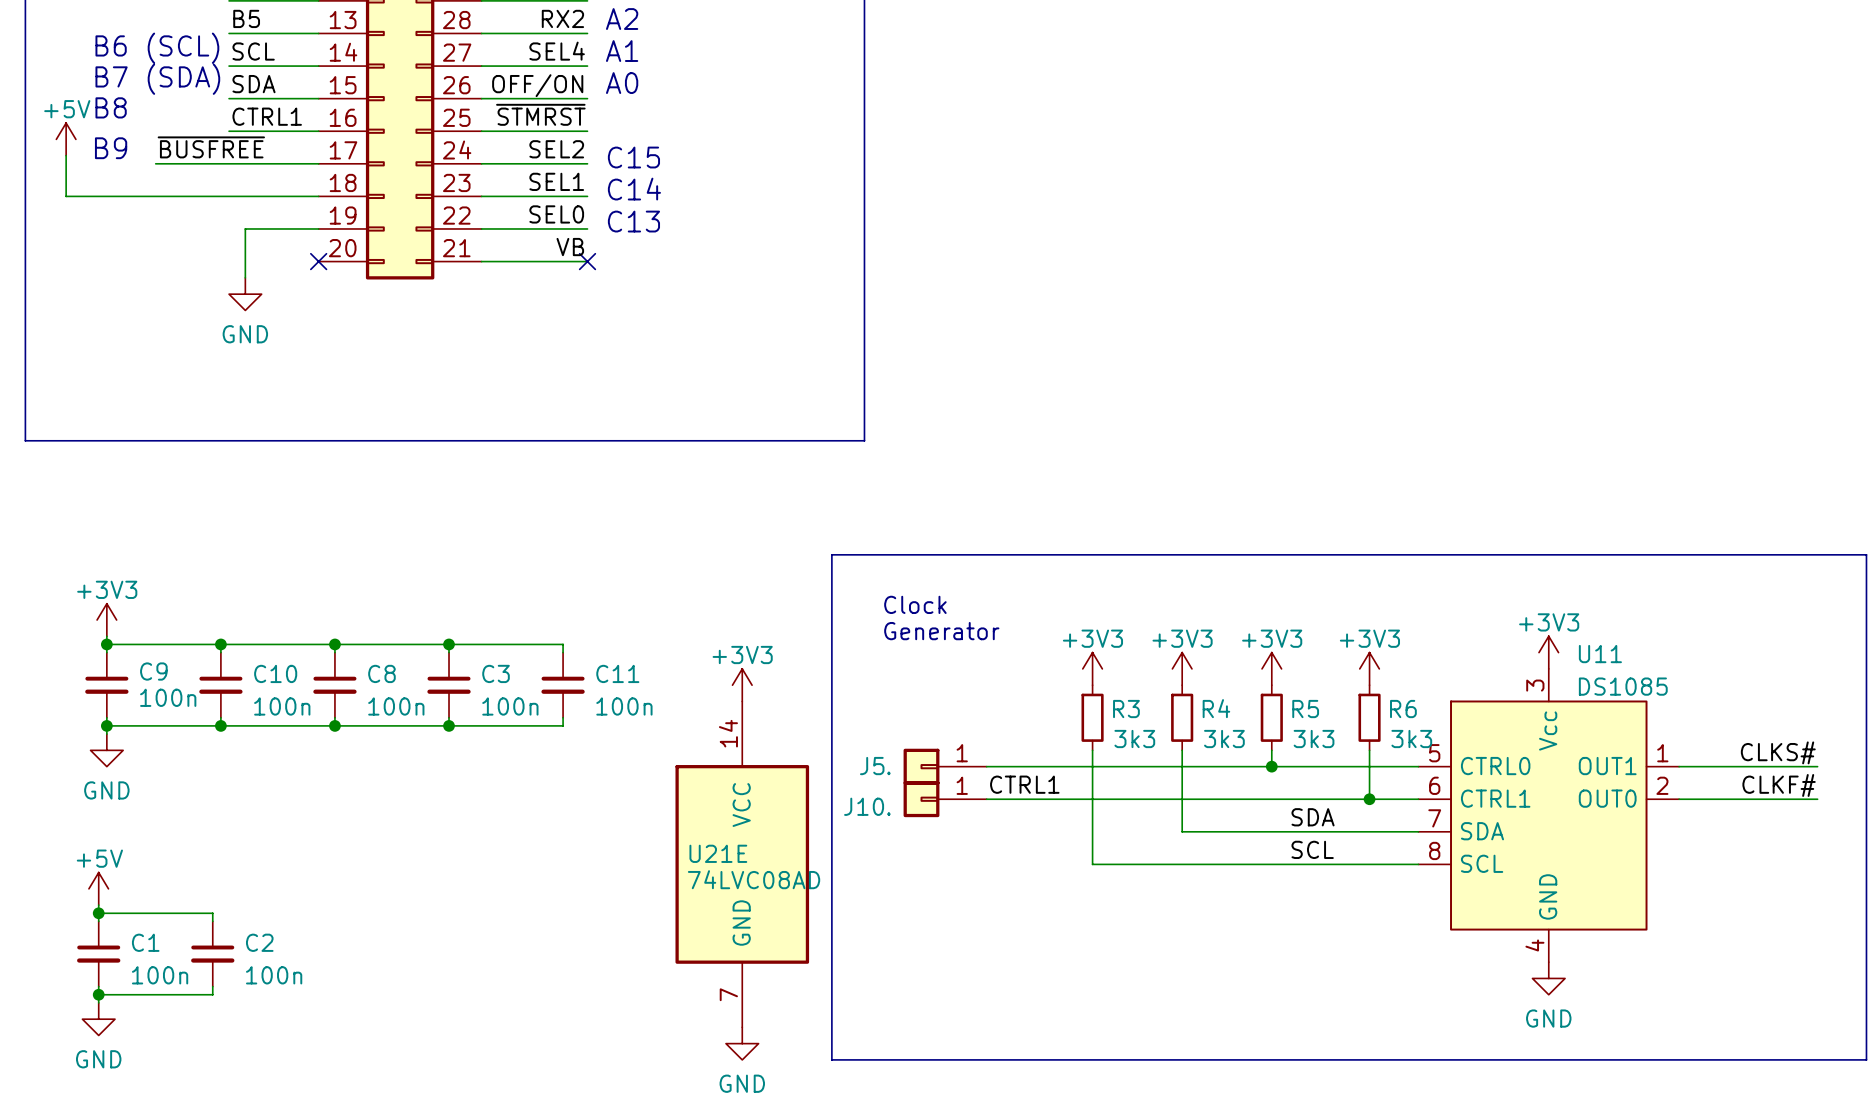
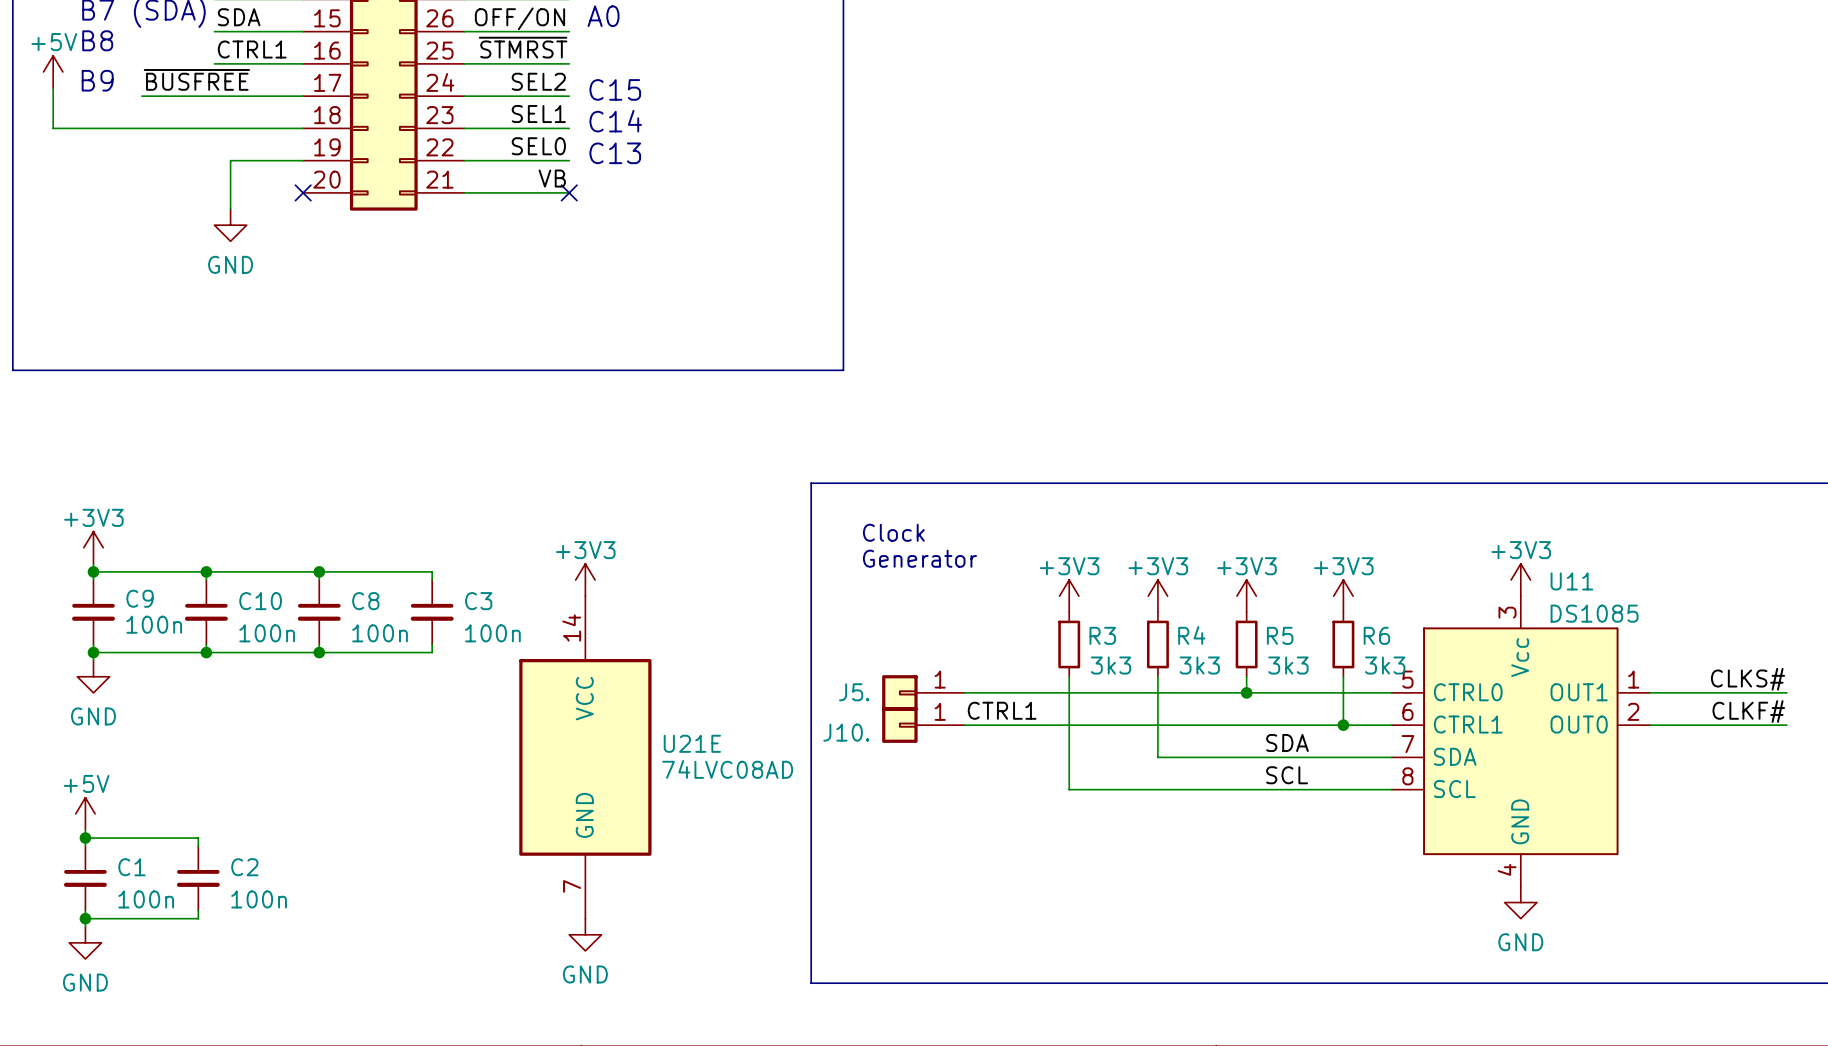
wire: (449, 644) (563, 644) (563, 652) -> none
junction: (449, 644) -> none
C11: 100n (563, 685) -> none
power symbol position: +3V3 (742, 685) -> +3V3 (585, 579)
wire: (563, 717) (563, 725) (449, 725) -> none
junction: (449, 725) -> none
U21E name position: U21E (718, 853) -> U21E (692, 743)
U21E position: (742, 864) -> (585, 757)
U21E value position: 74LVC08AD (754, 879) -> 74LVC08AD (727, 769)
power symbol position: GND (742, 1043) -> GND (585, 934)

